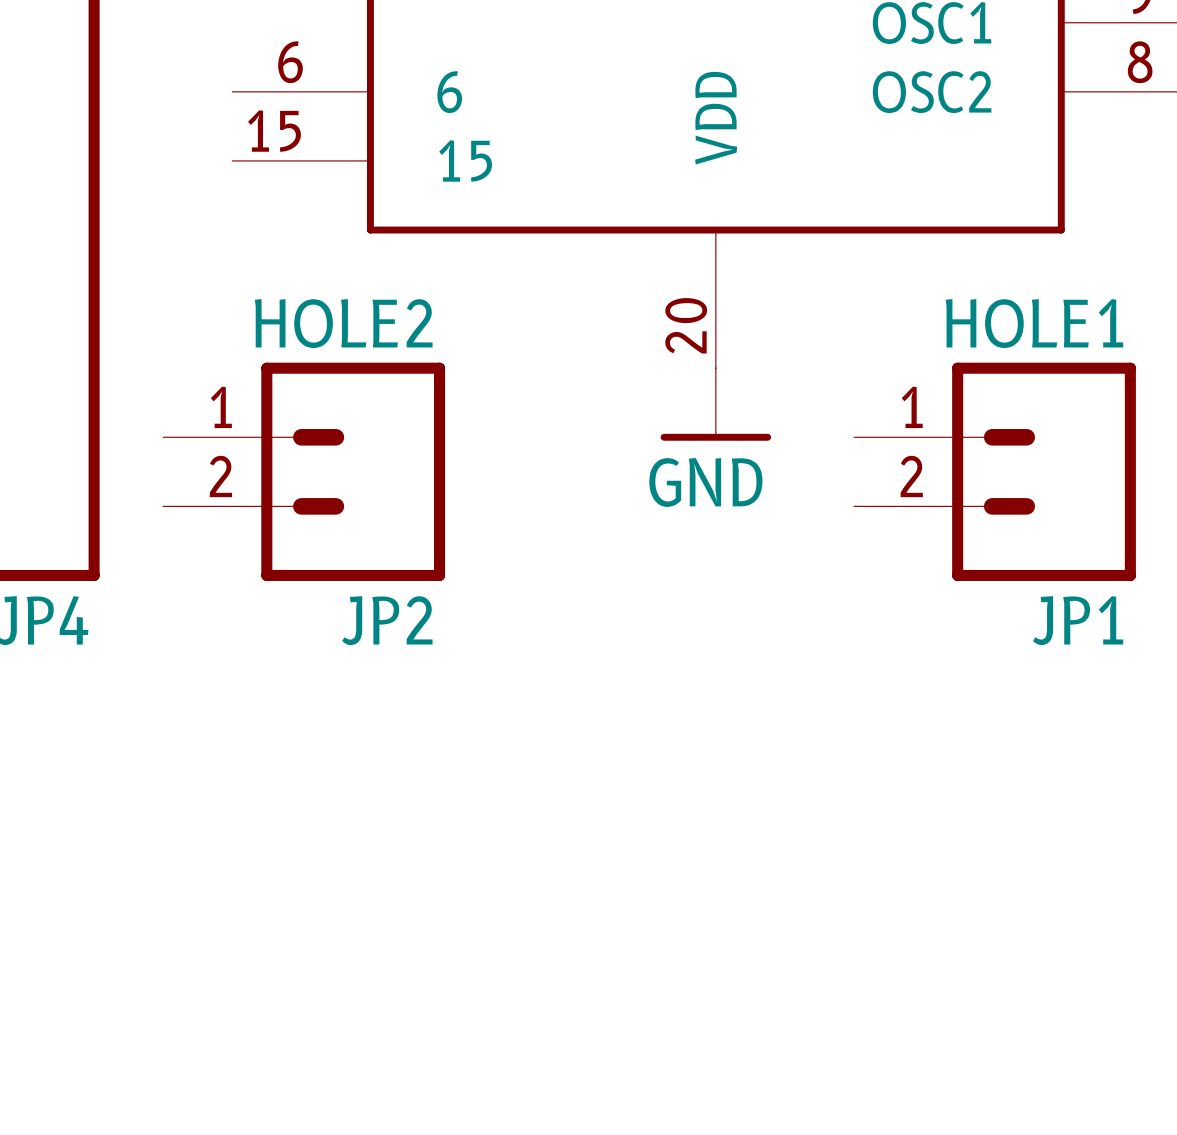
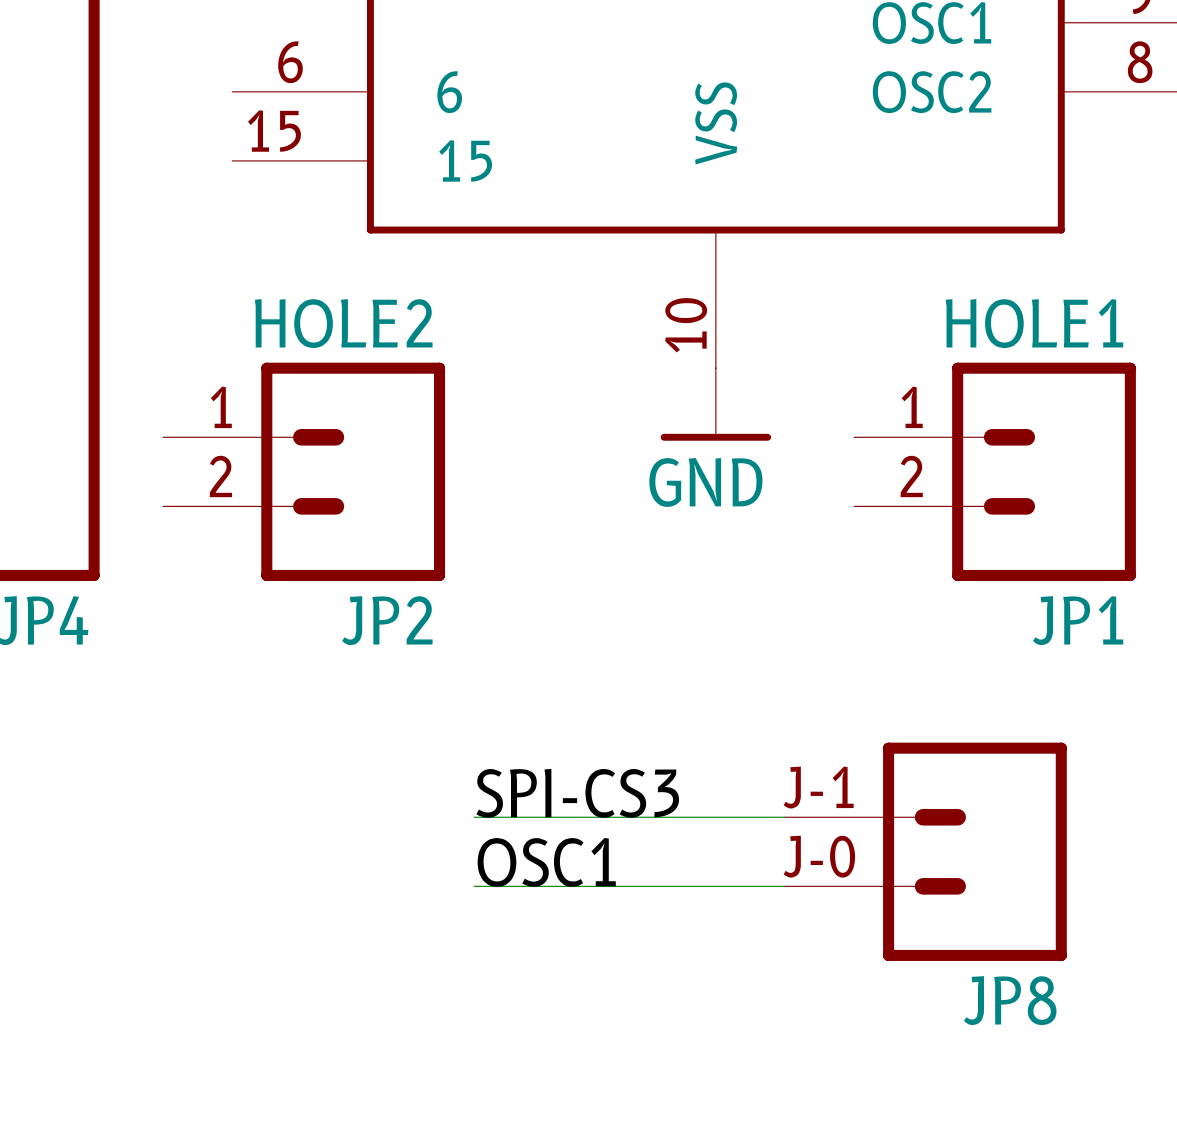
part pin name: VDD (716, 118) -> VSS (716, 123)
part pin number: 20 (686, 325) -> 10 (686, 325)
label: none -> SPI-CS3 (577, 793)
wire: none -> (474, 817) (784, 817)
JP8: none -> (925, 851)
label: none -> OSC1 (546, 862)
wire: none -> (474, 886) (784, 886)

